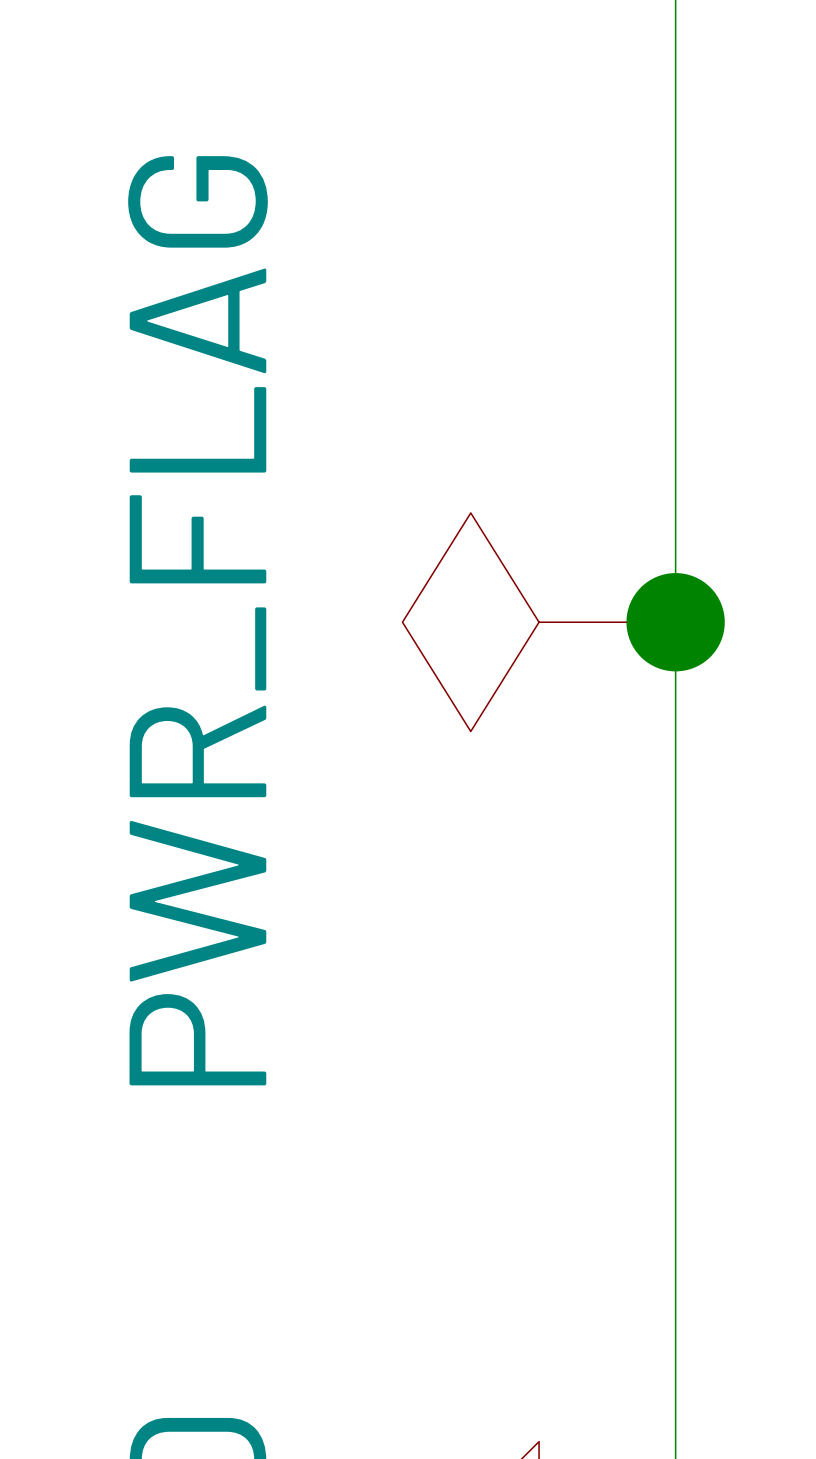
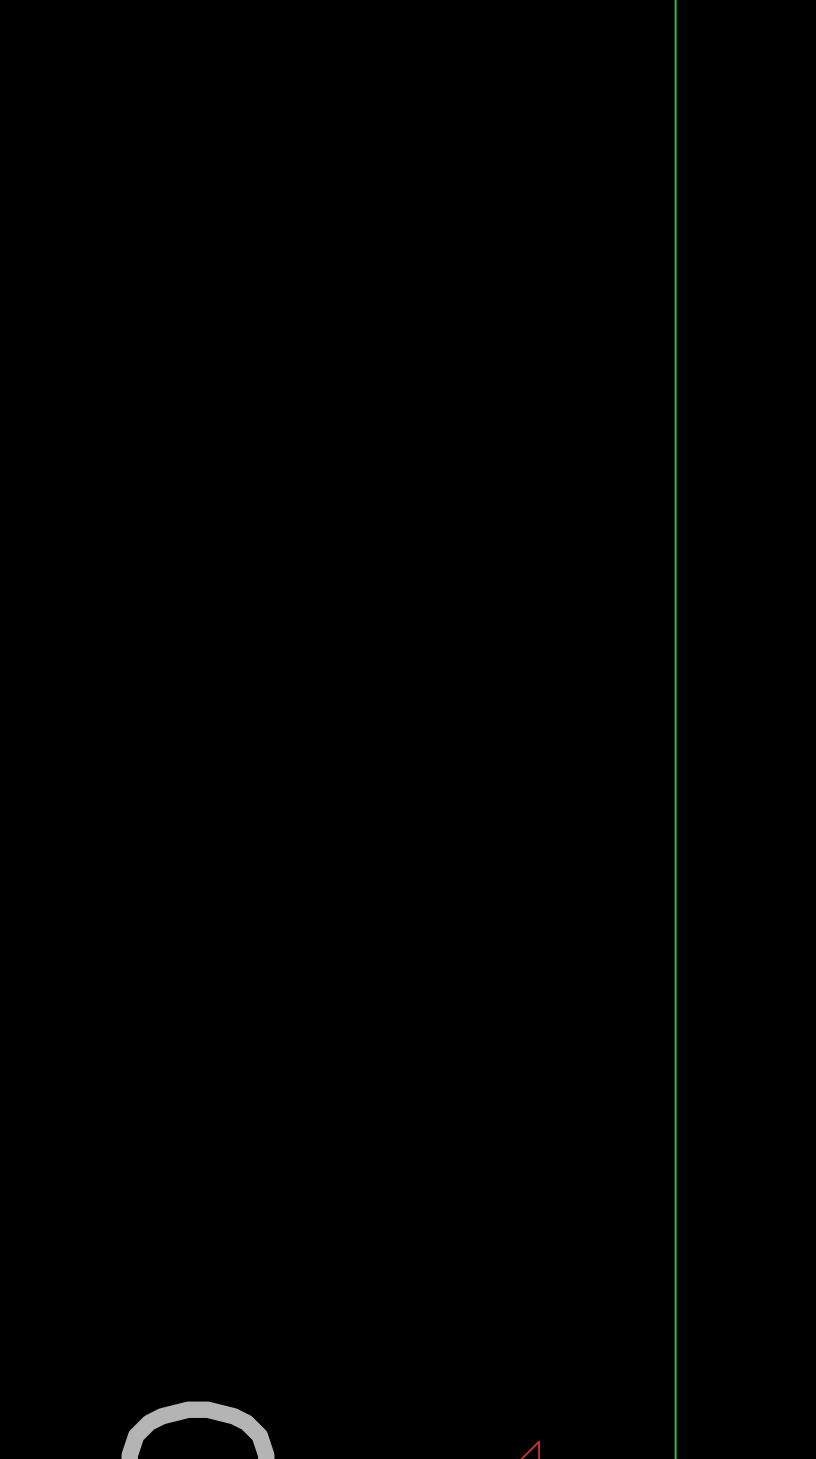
power symbol: PWR_FLAG (539, 622) -> none
junction: (675, 622) -> none

